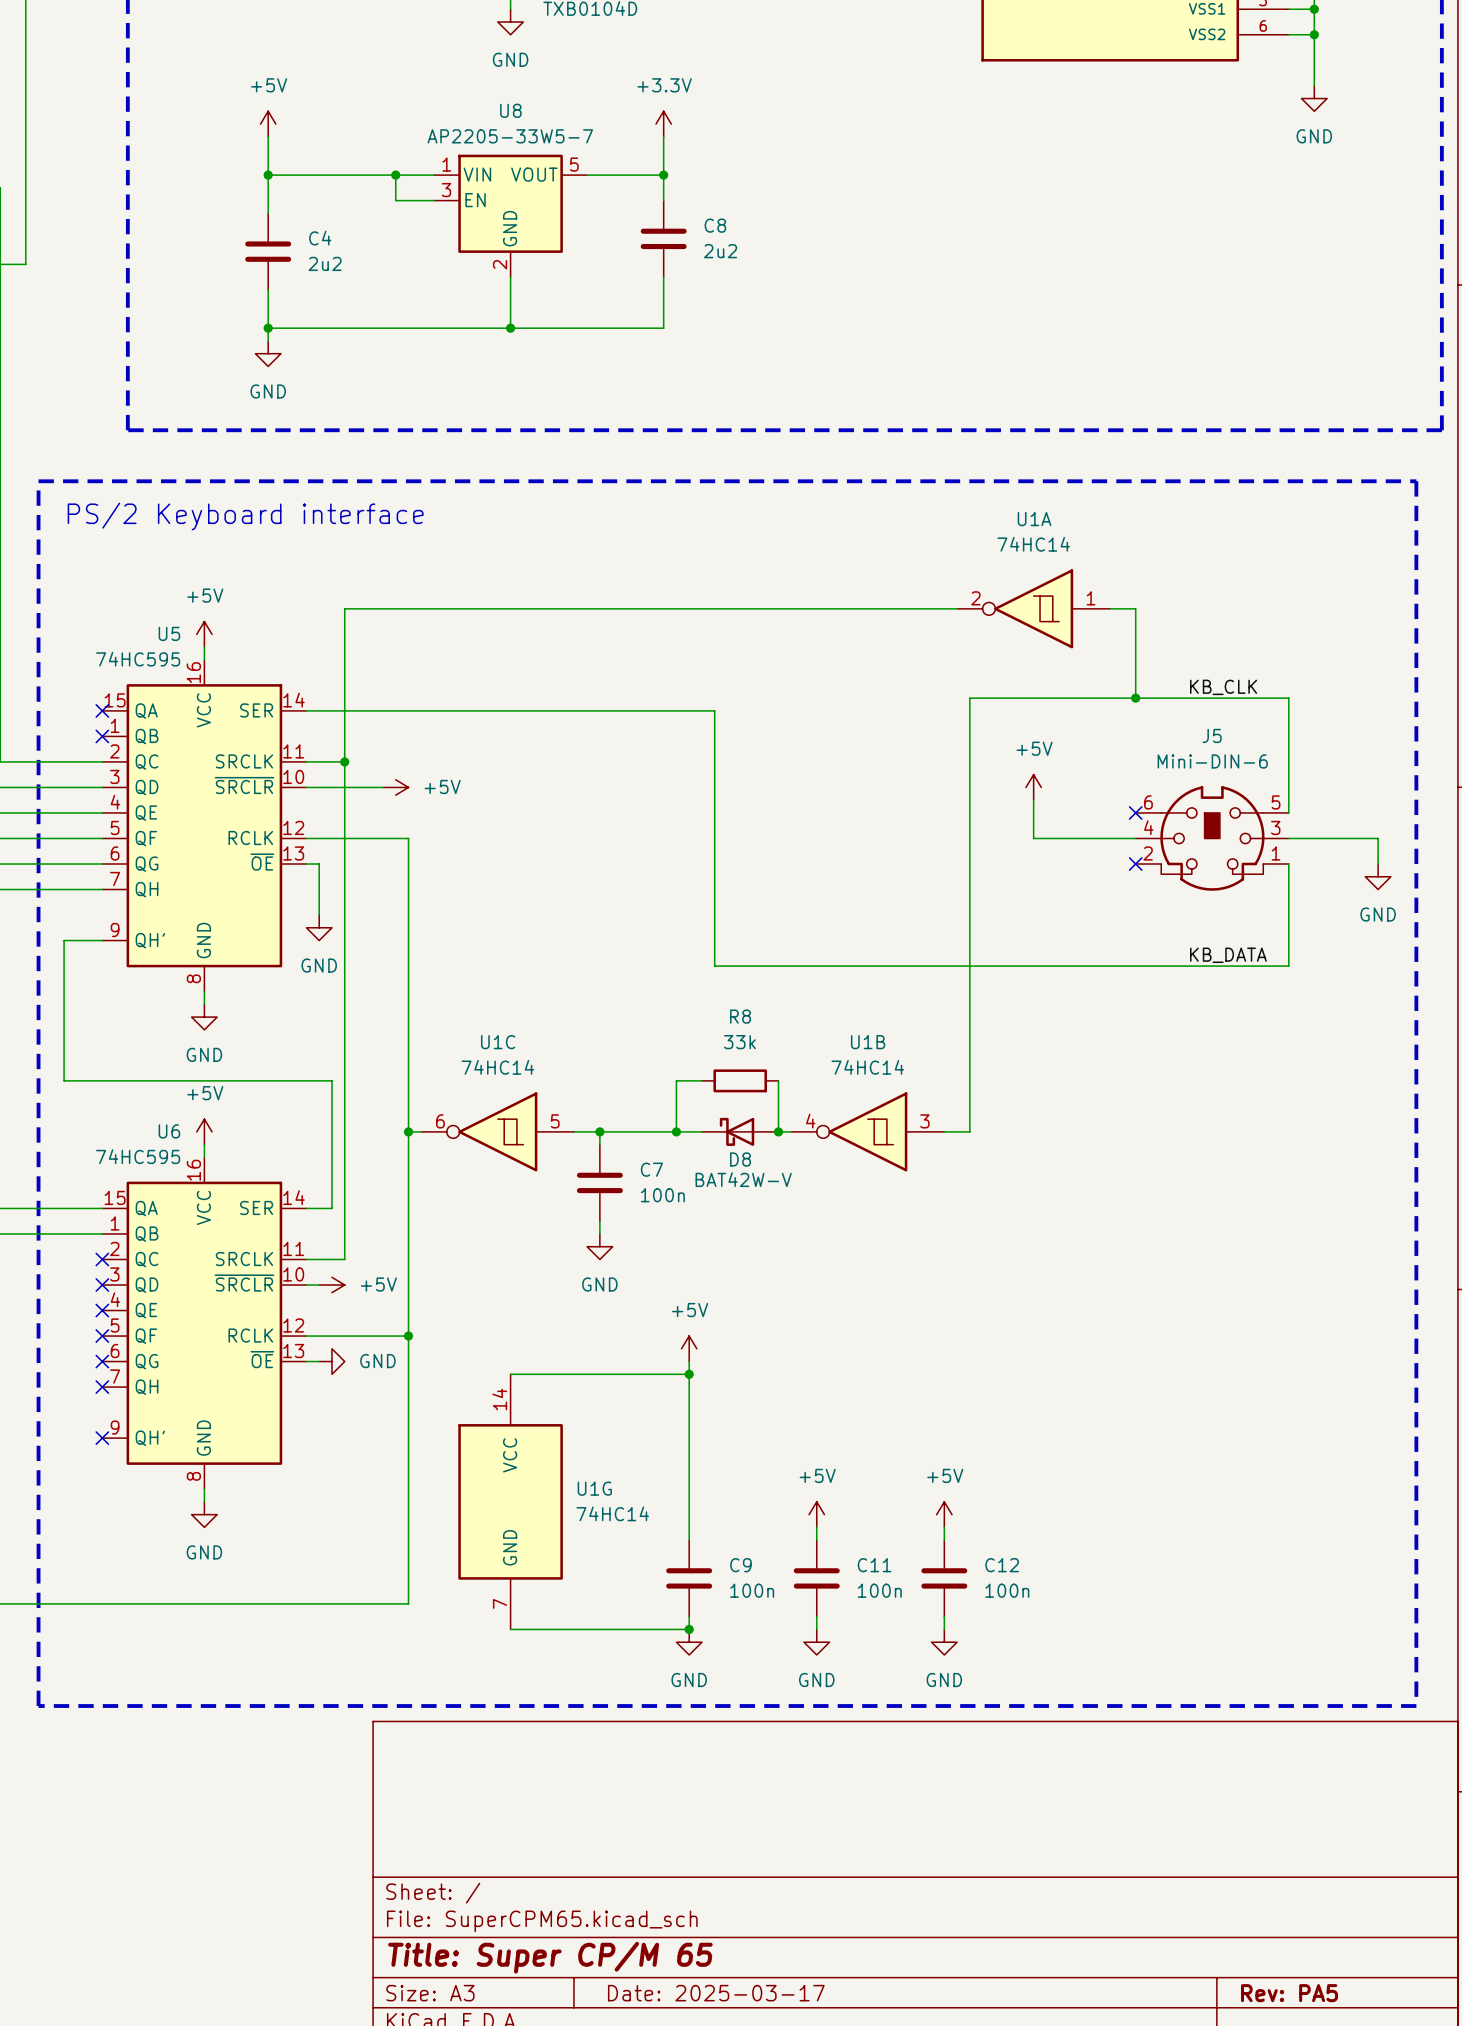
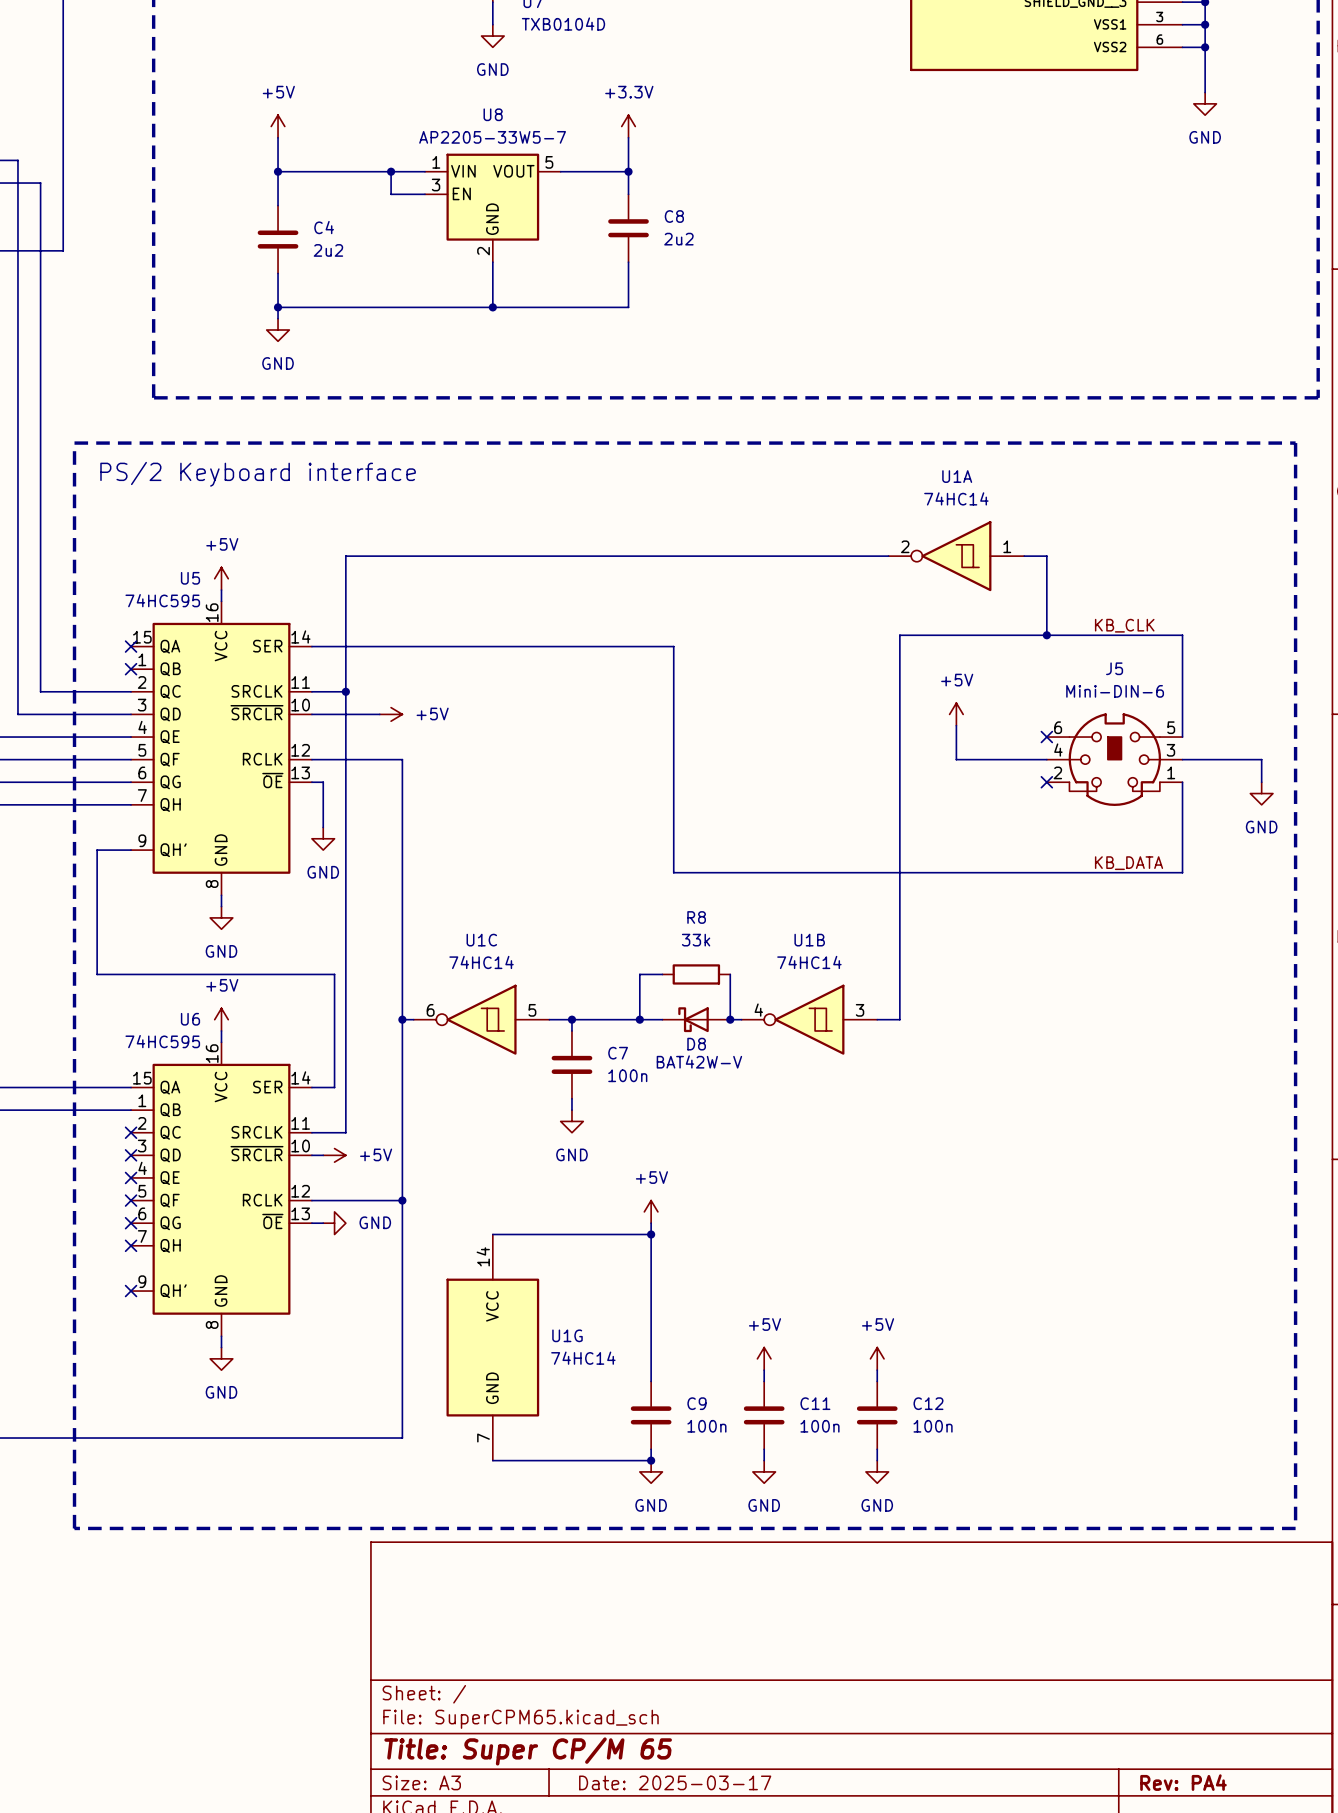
title block: Rev: PA5 (1289, 1993) -> Rev: PA4 (1183, 1782)

